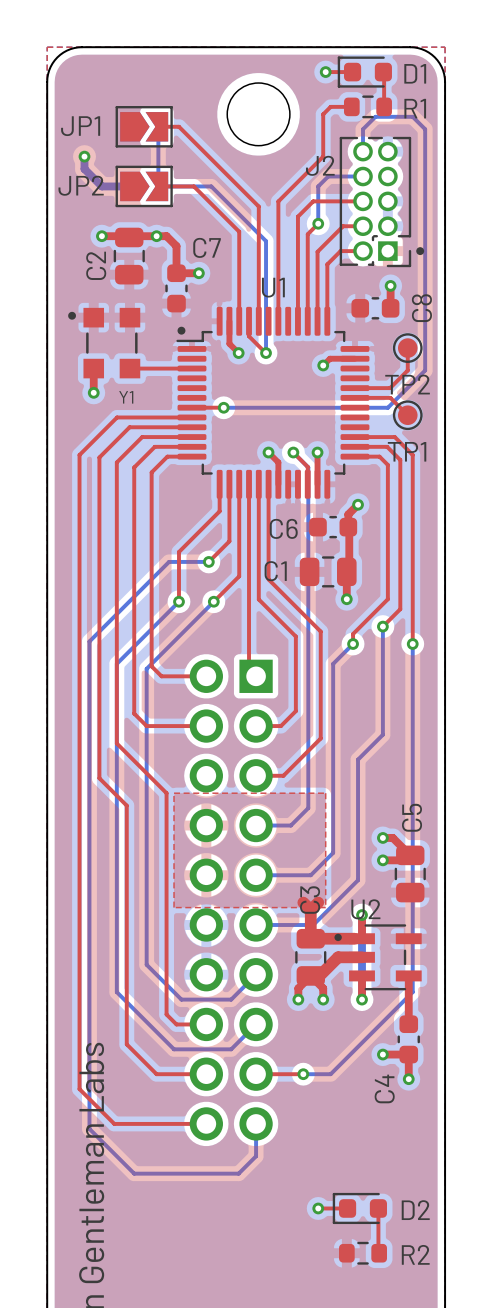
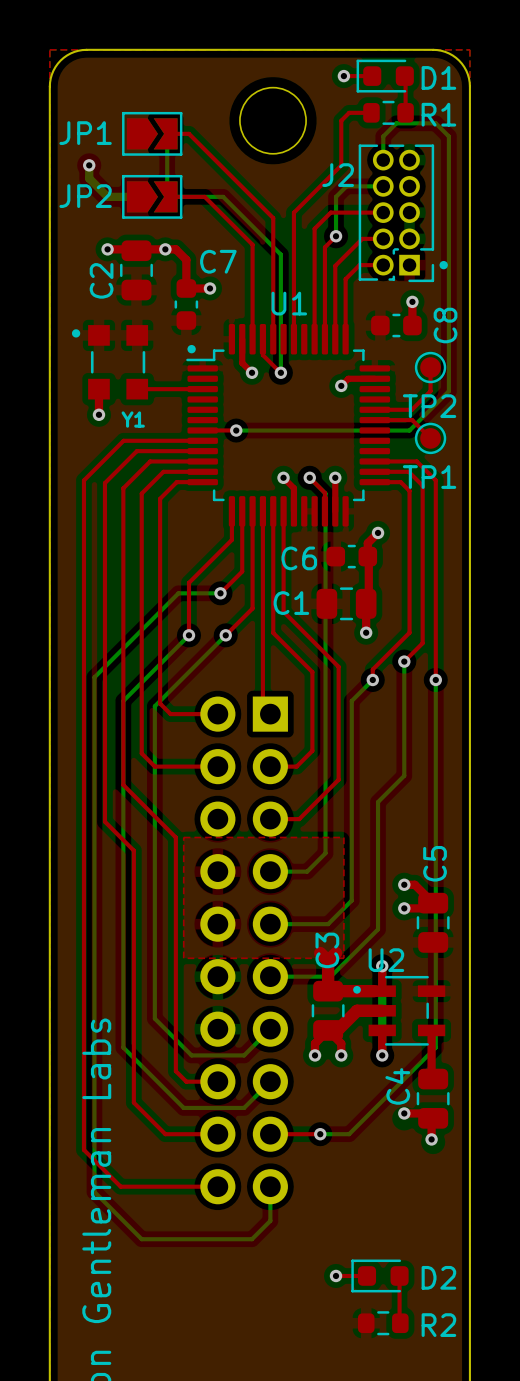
C4 footprint: [397, 1015, 420, 1064] -> [416, 1068, 450, 1129]
C4 name position: C4 (384, 1088) -> C4 (397, 1086)

